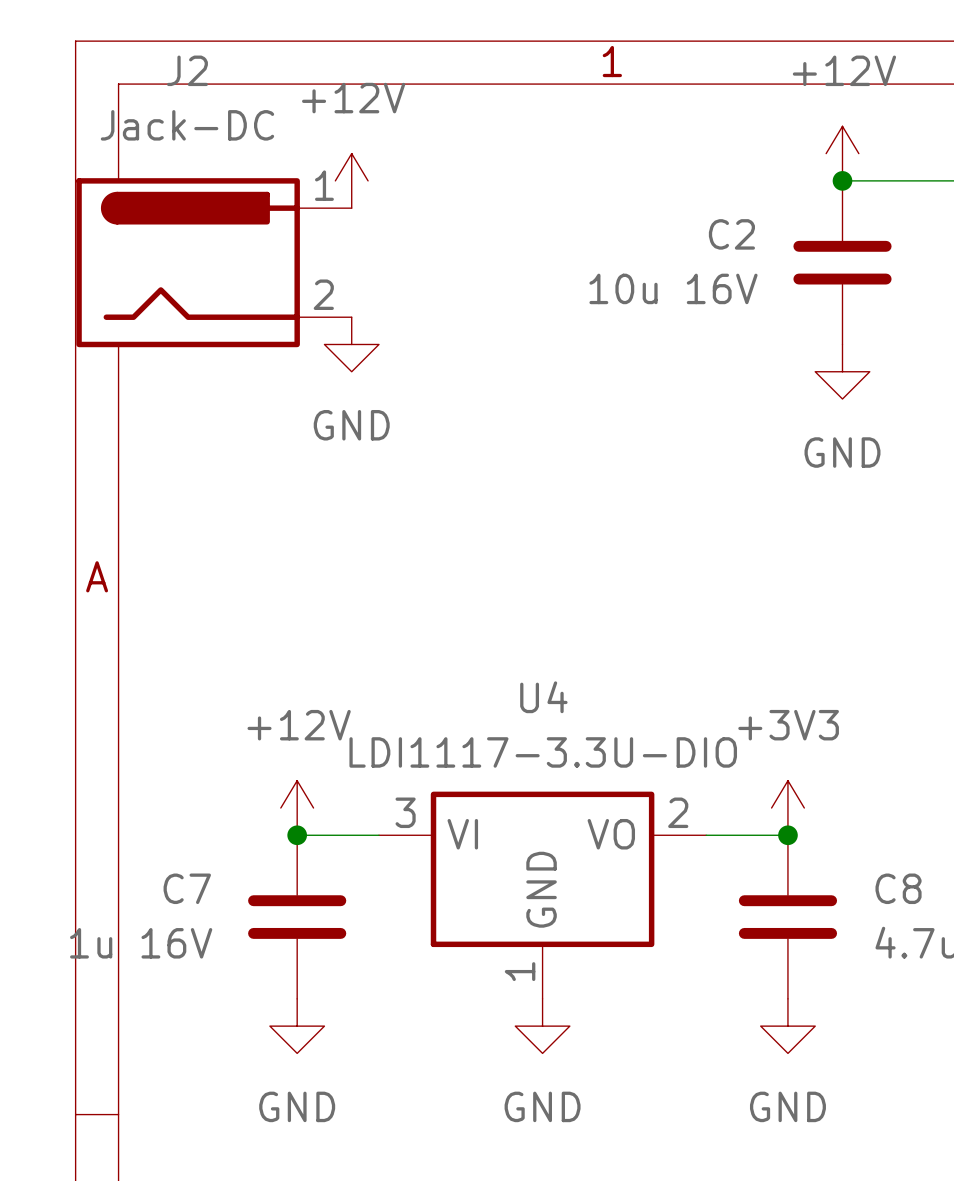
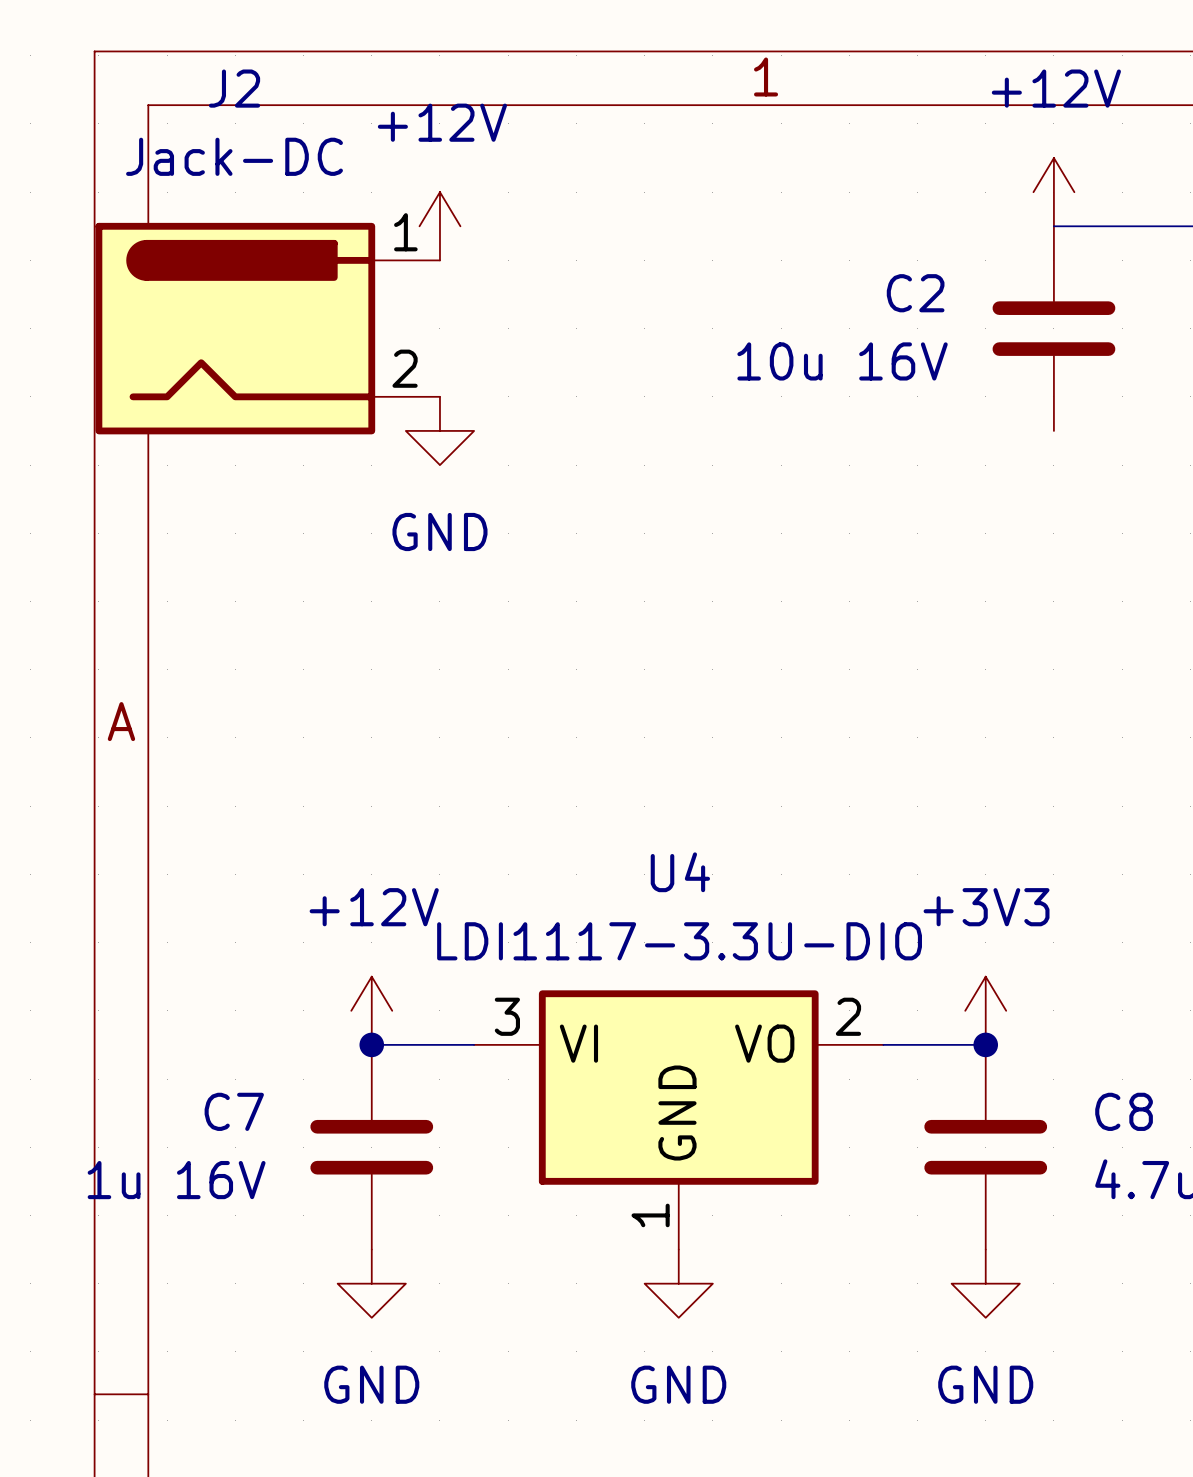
junction: (842, 180) -> none
power symbol: GND (842, 371) -> none

